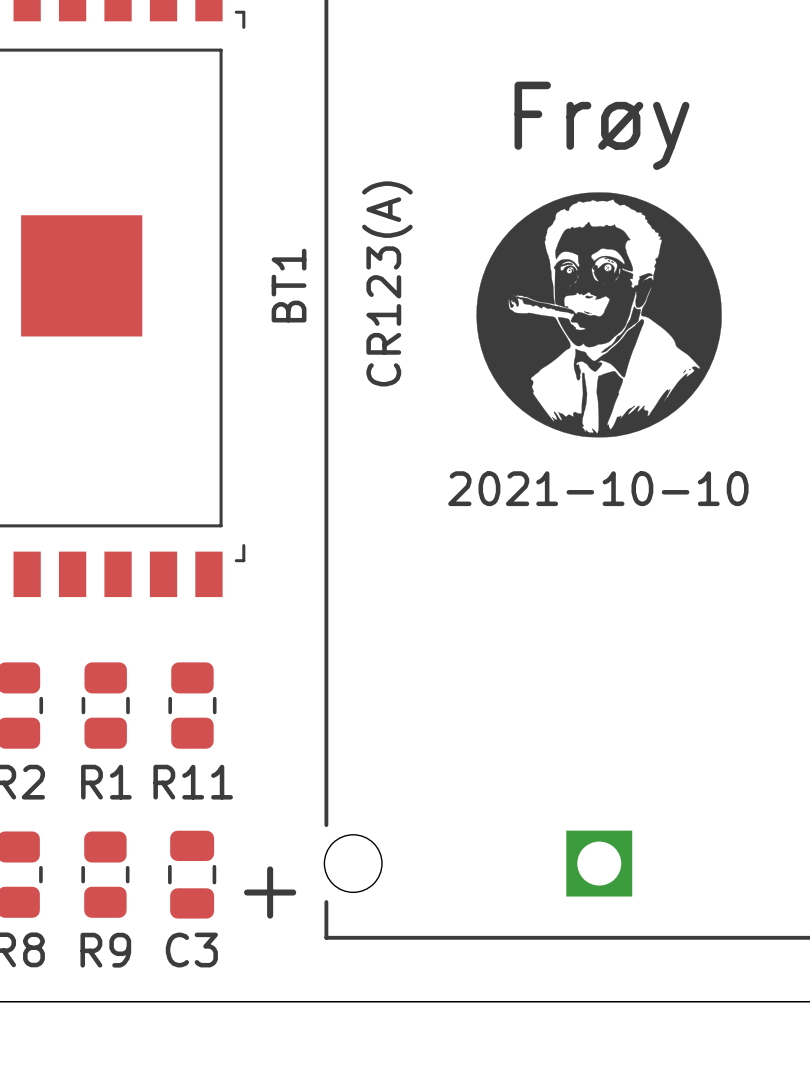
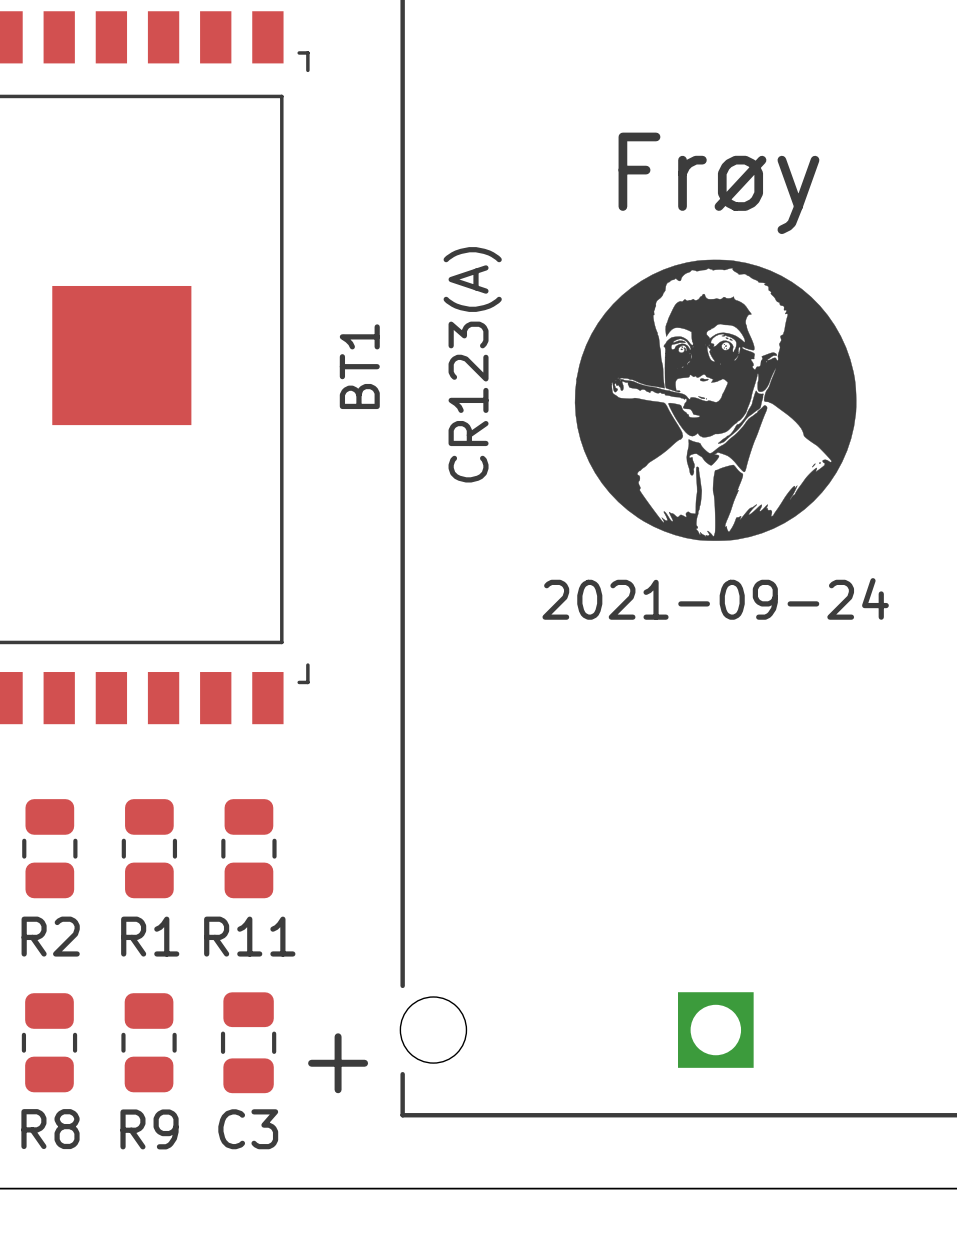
text: 2021-10-10 (598, 488) -> 2021-09-24 (715, 598)

